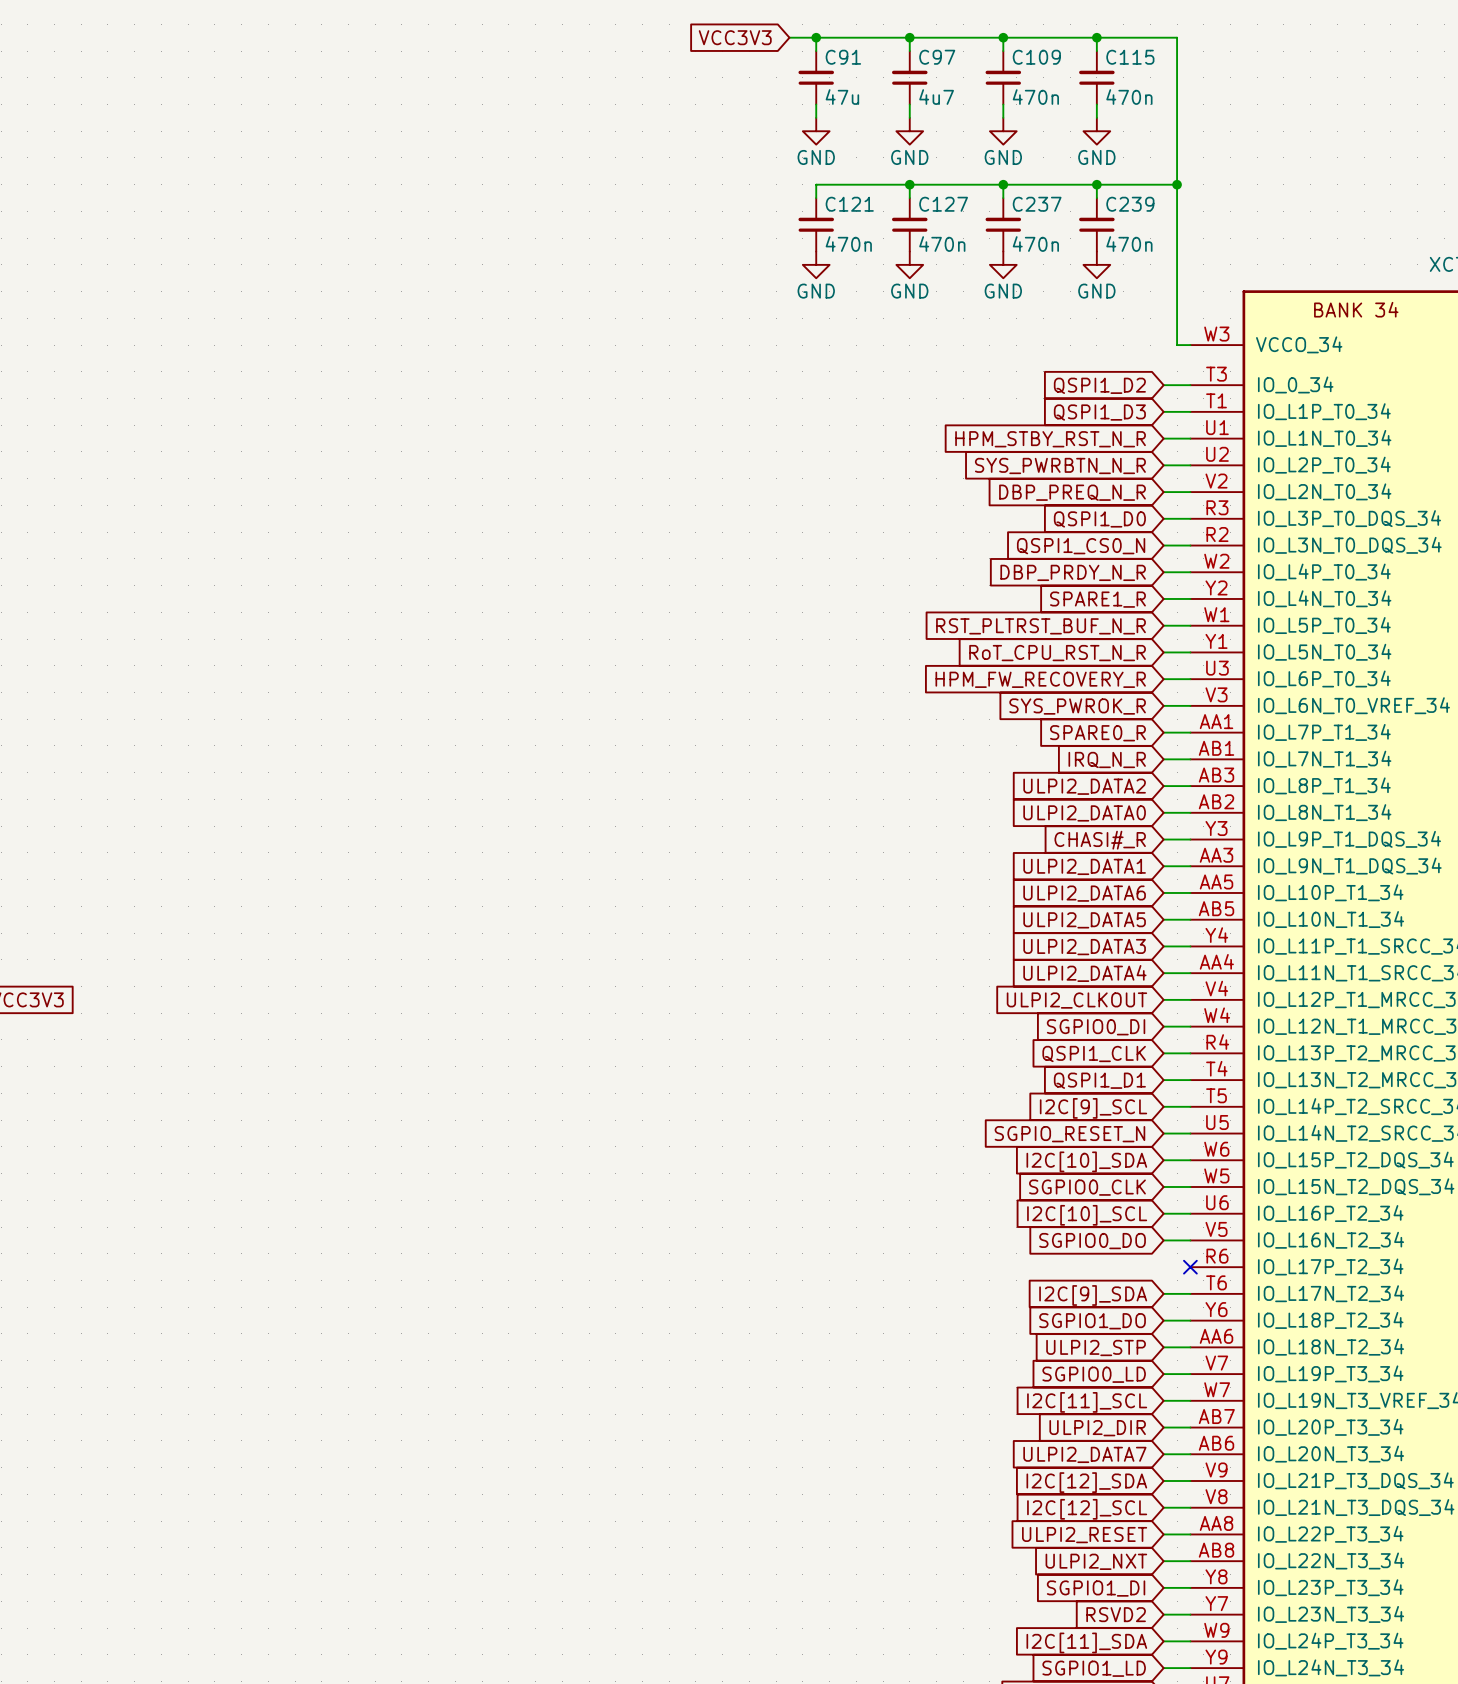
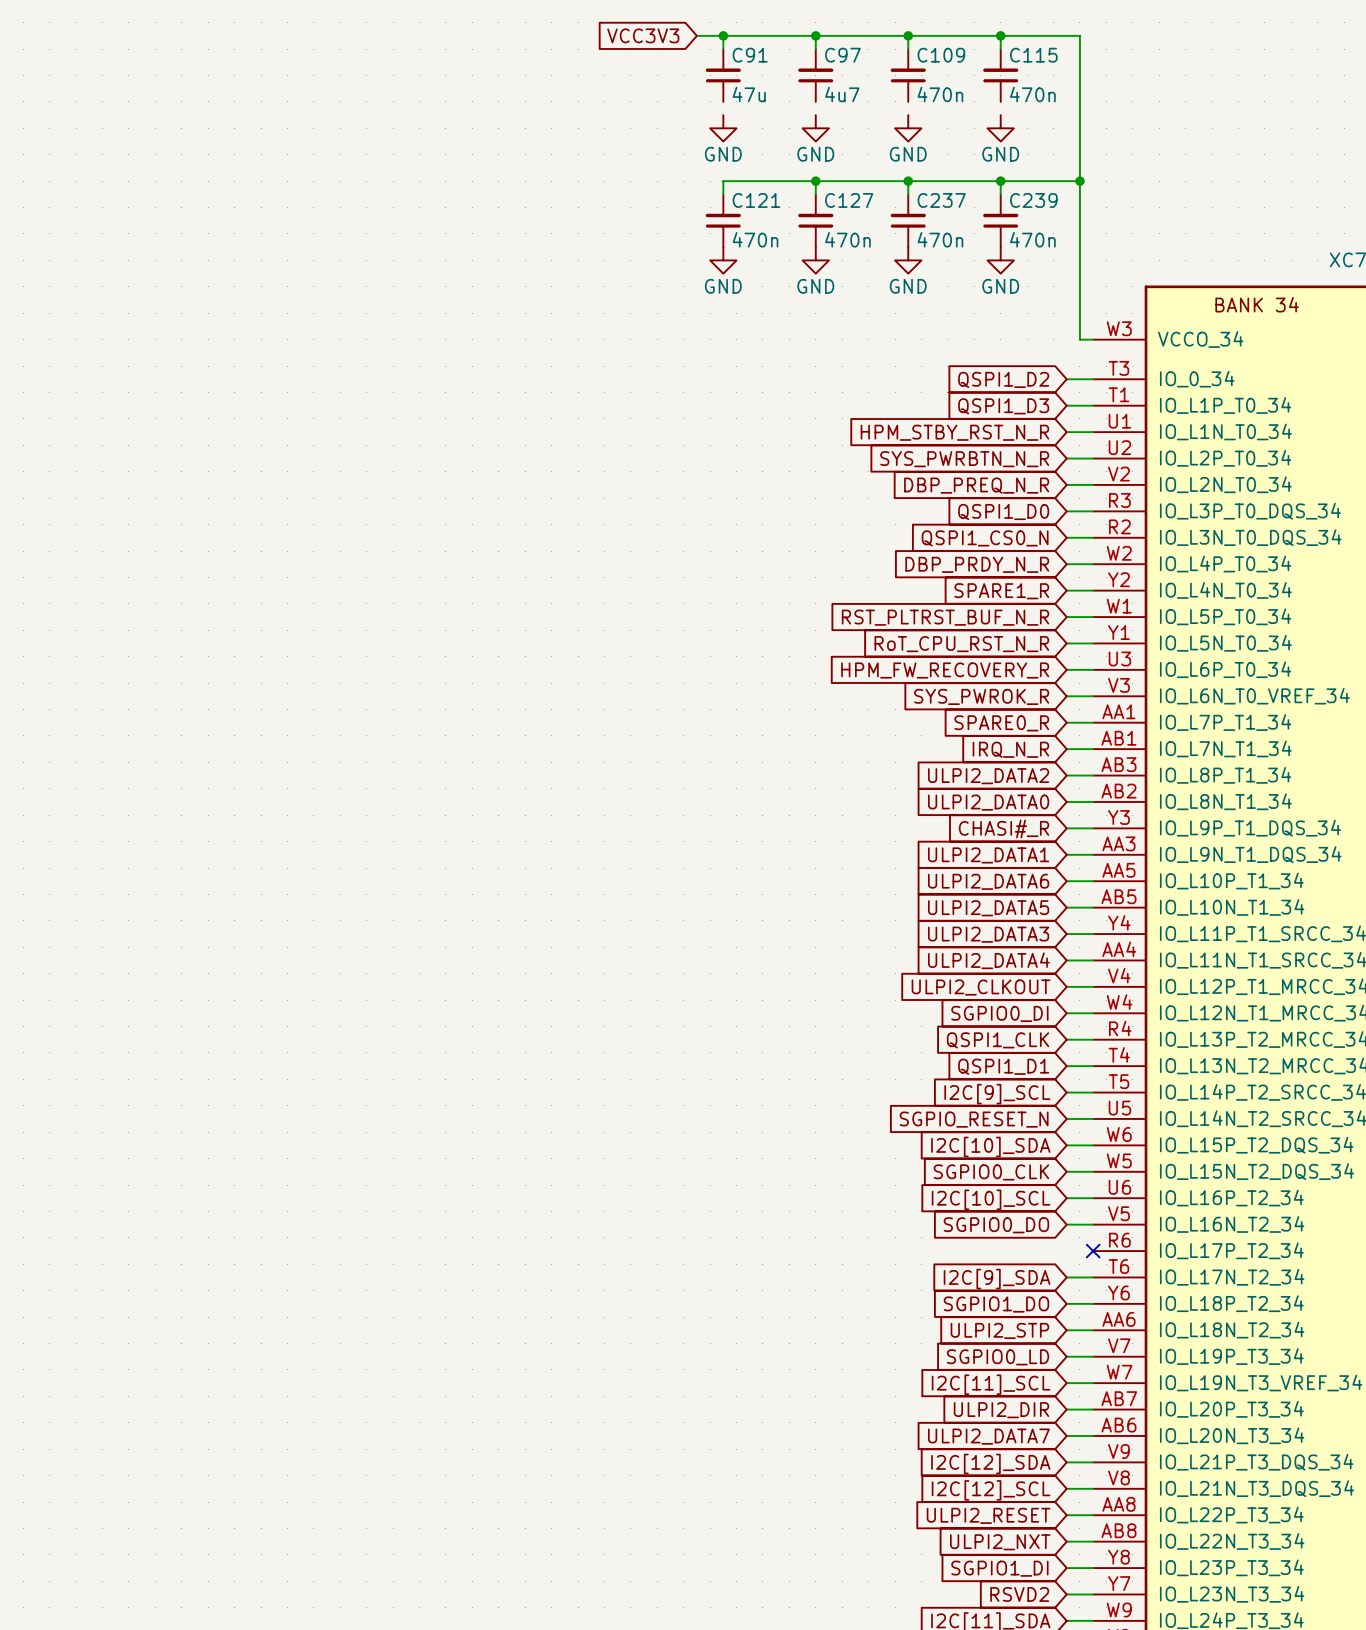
wire: (816, 104) (816, 117) -> none
wire: (909, 104) (909, 117) -> none
wire: (1003, 104) (1003, 117) -> none
wire: (1096, 104) (1096, 117) -> none

